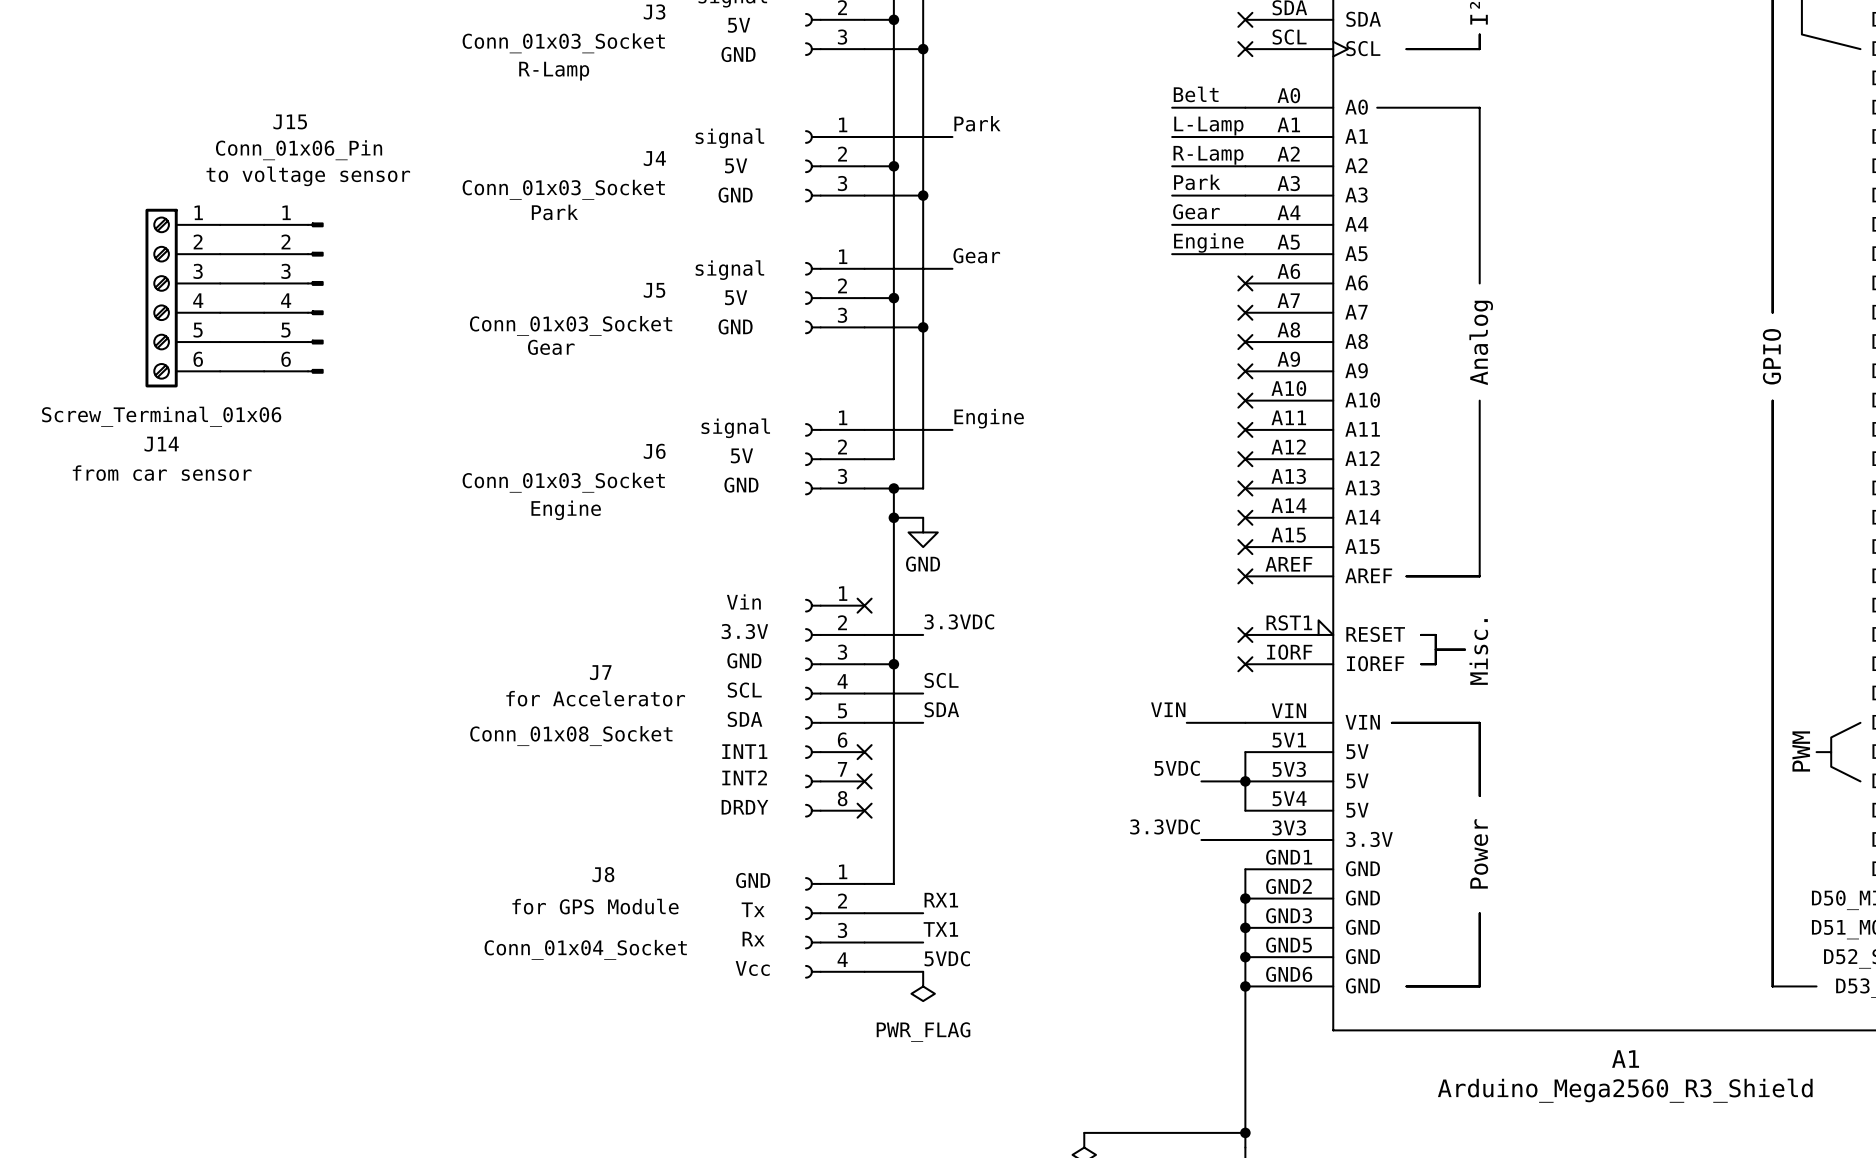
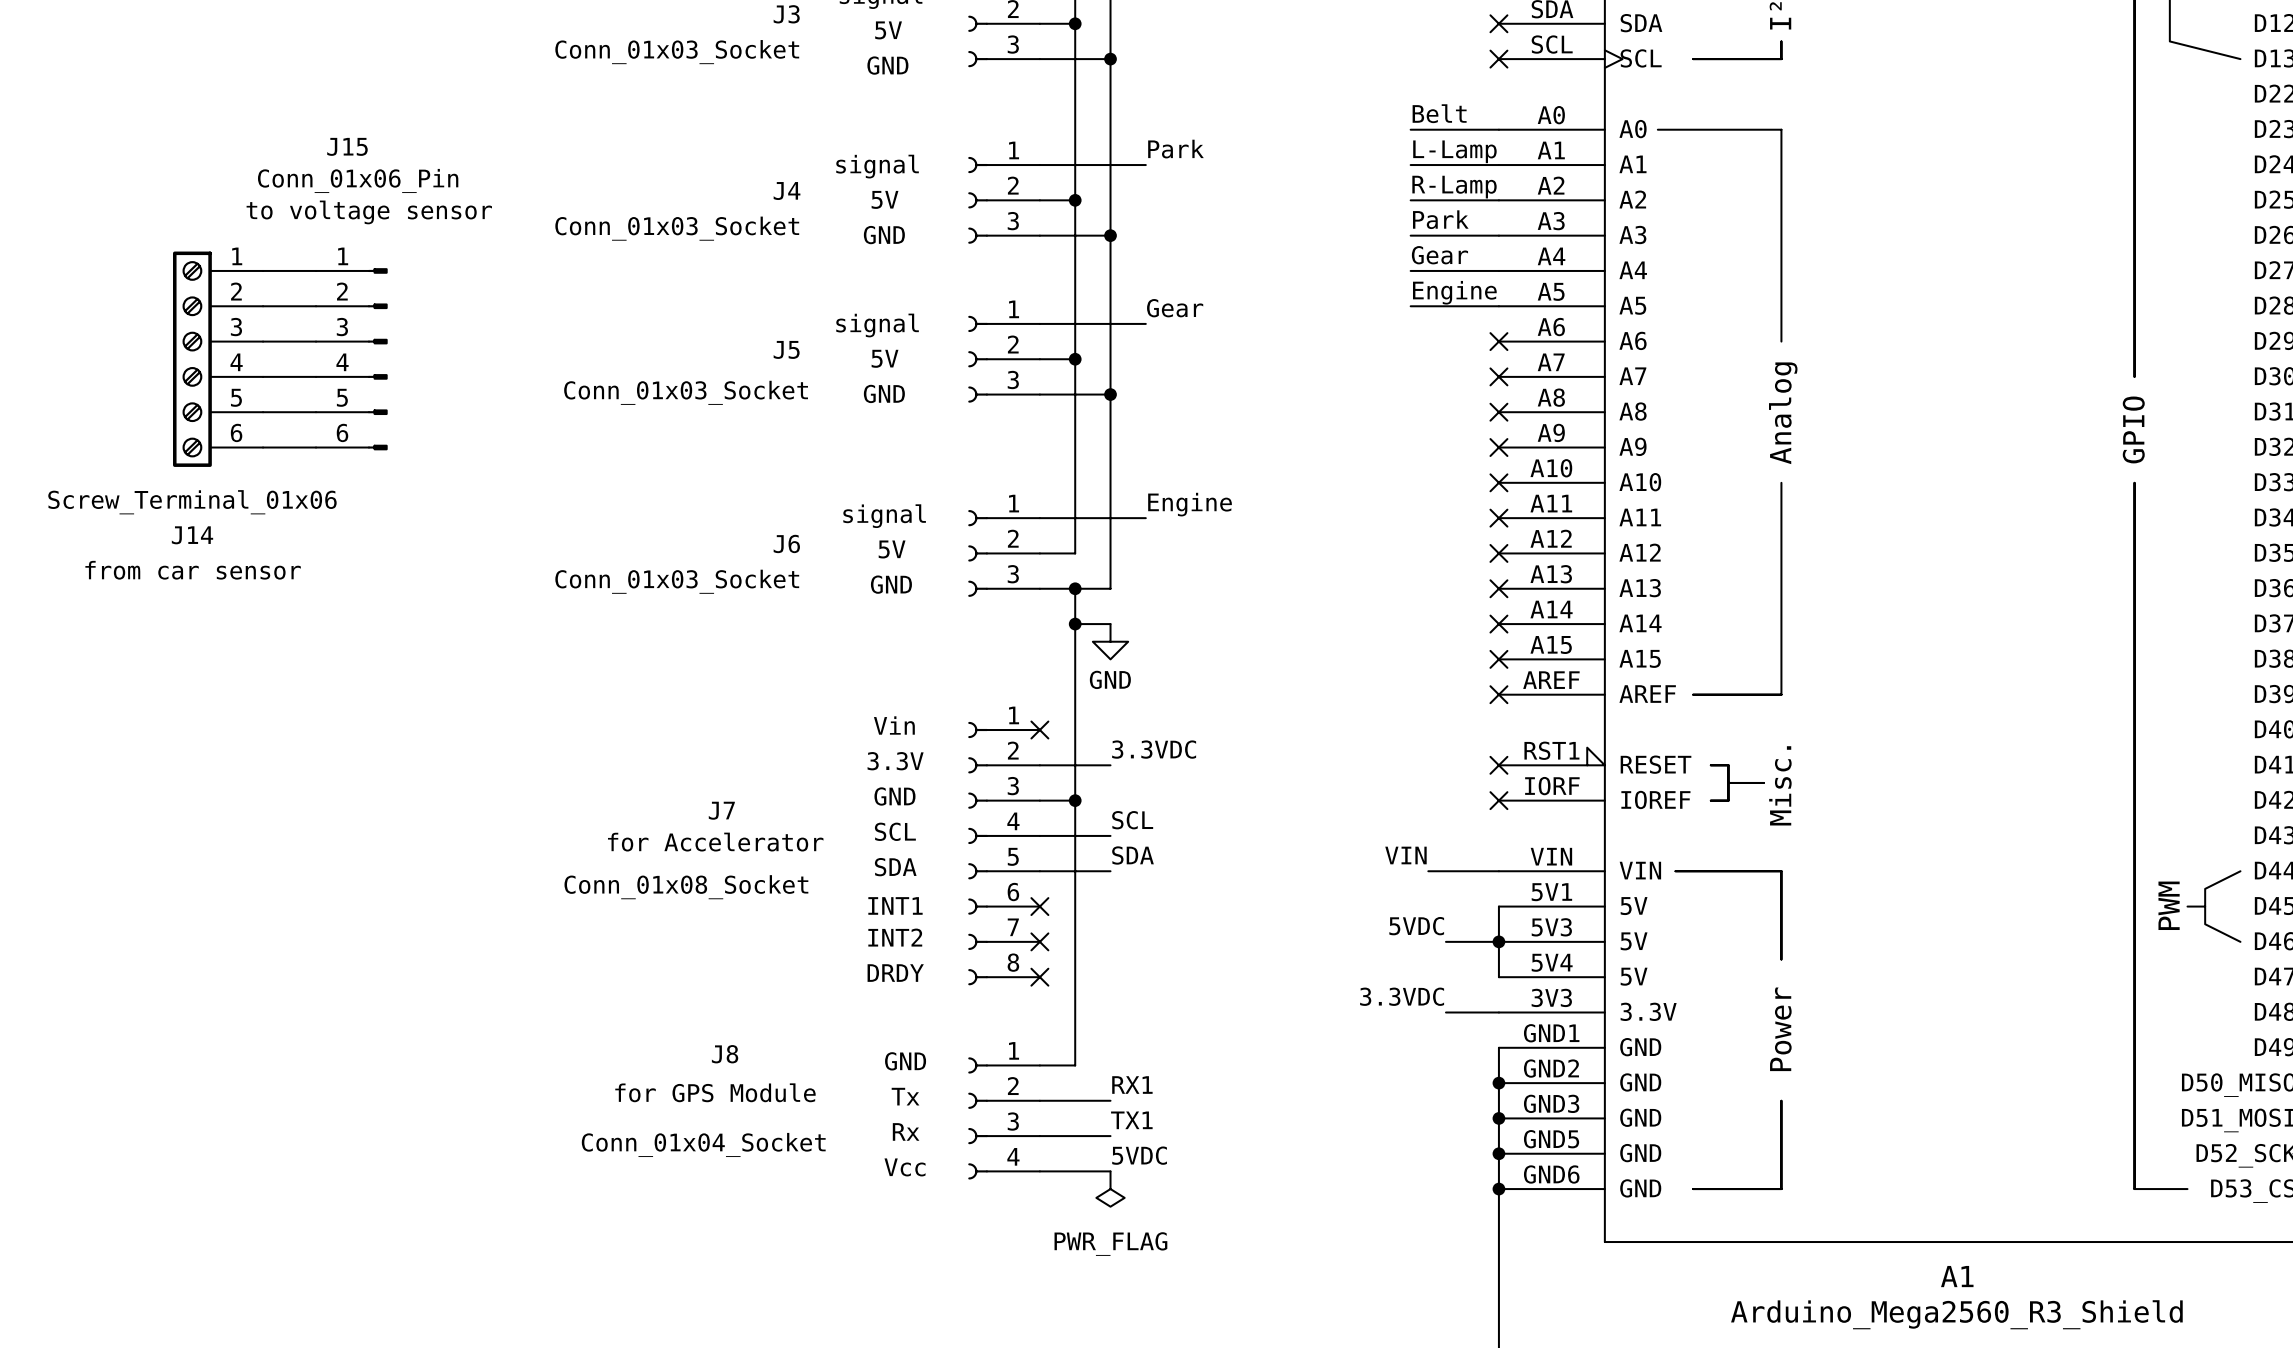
J3 text: R-Lamp (554, 71) -> none
J4 text: Park (554, 212) -> none
J5 text: Gear (551, 347) -> none
J6 text: Engine (566, 510) -> none

